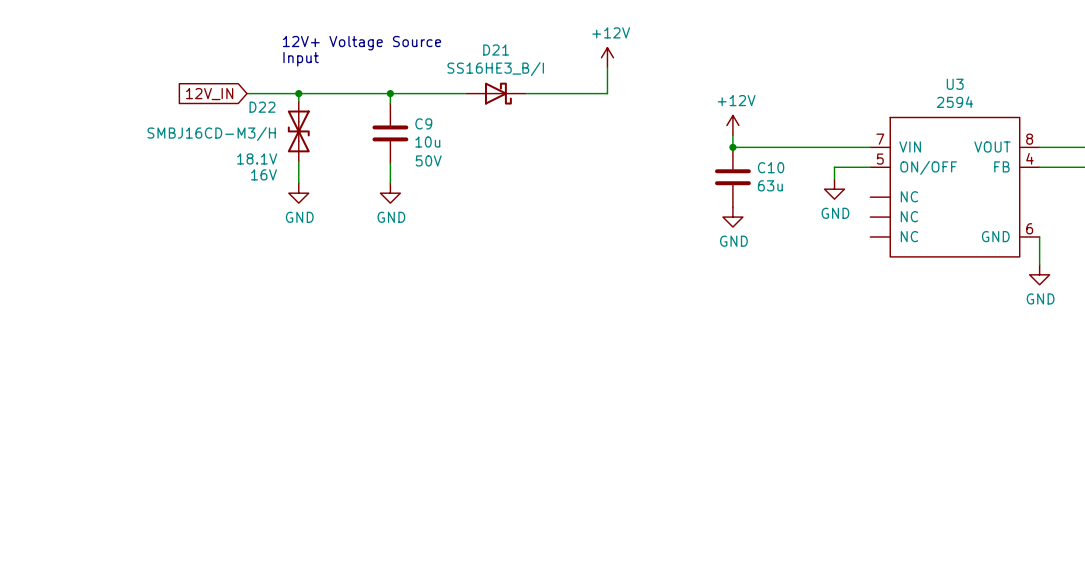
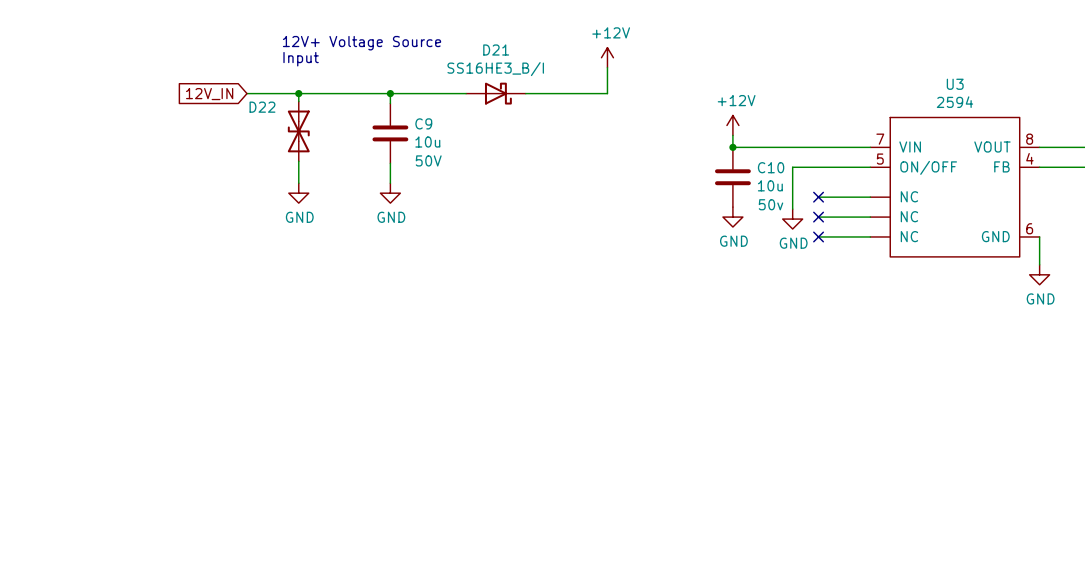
D22 value: SMBJ16CD-M3/H (211, 134) -> none
D22 text: 18.1V (257, 158) -> none
wire: (834, 167) (834, 179) -> (834, 167) (792, 167) (792, 209)
D22 text: 16V (264, 174) -> none
C10 value: 63u (770, 185) -> 10u (770, 185)
power symbol position: GND (834, 189) -> GND (792, 219)
wire: none -> (818, 197) (870, 197)
no-connect mark: none -> (818, 197)
C10 text: none -> 50v (771, 204)
wire: none -> (818, 217) (870, 217)
no-connect mark: none -> (818, 217)
wire: none -> (818, 236) (870, 236)
no-connect mark: none -> (818, 236)

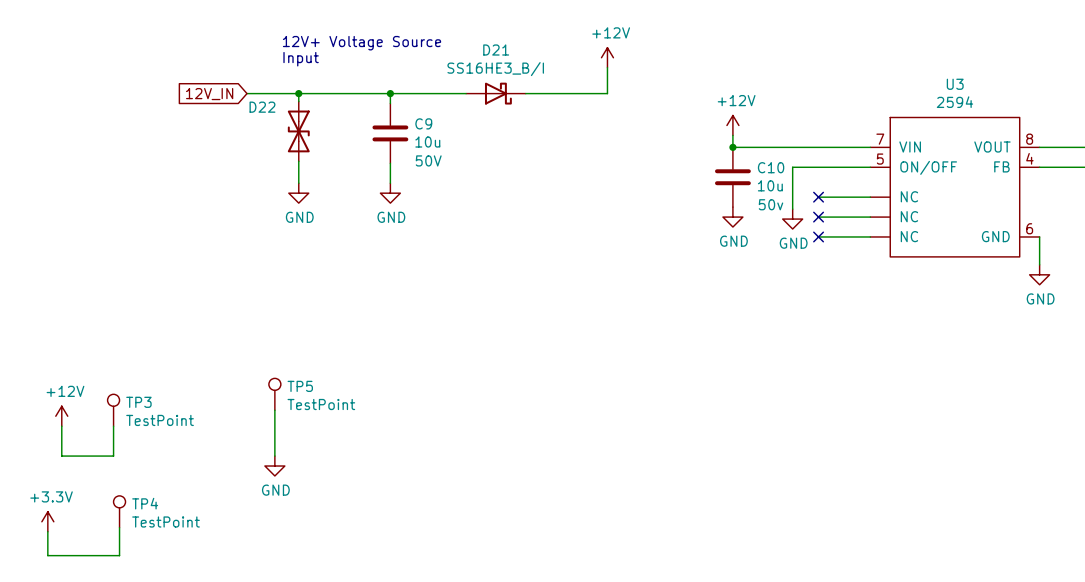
TP5: none -> TestPoint (274, 394)
TP3: none -> TestPoint (113, 410)
wire: none -> (274, 410) (274, 456)
power symbol: none -> +12V (61, 416)
wire: none -> (61, 426) (61, 456) (113, 456) (113, 426)
power symbol: none -> GND (274, 466)
TP4: none -> TestPoint (119, 511)
power symbol: none -> +3.3V (47, 521)
wire: none -> (119, 527) (119, 555) (47, 555) (47, 531)

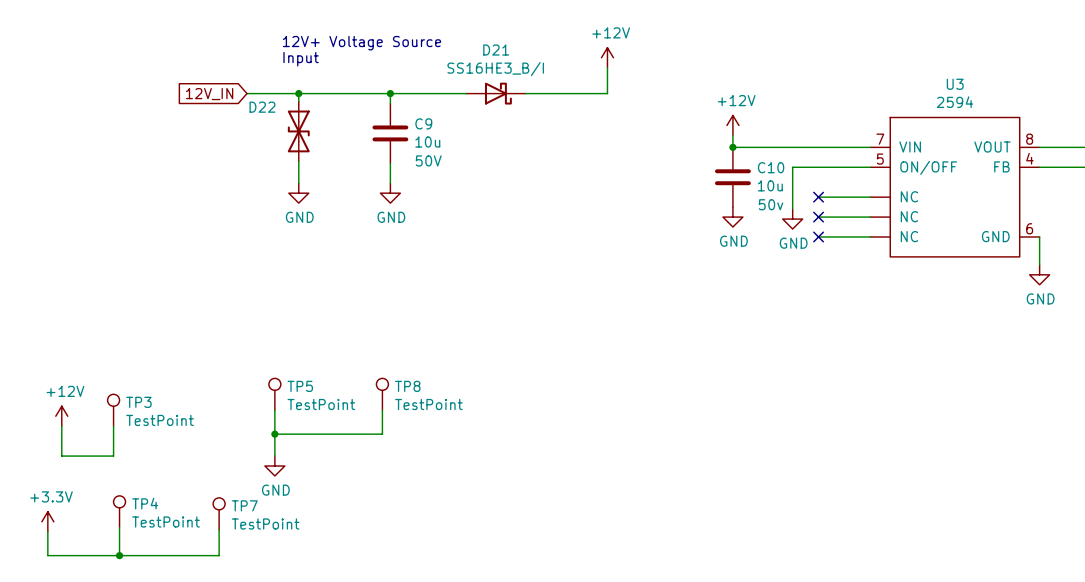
TP8: none -> TestPoint (382, 394)
wire: none -> (382, 410) (382, 434) (274, 434)
junction: none -> (274, 434)
TP7: none -> TestPoint (219, 513)
wire: none -> (219, 529) (219, 555) (119, 555)
junction: none -> (119, 555)

